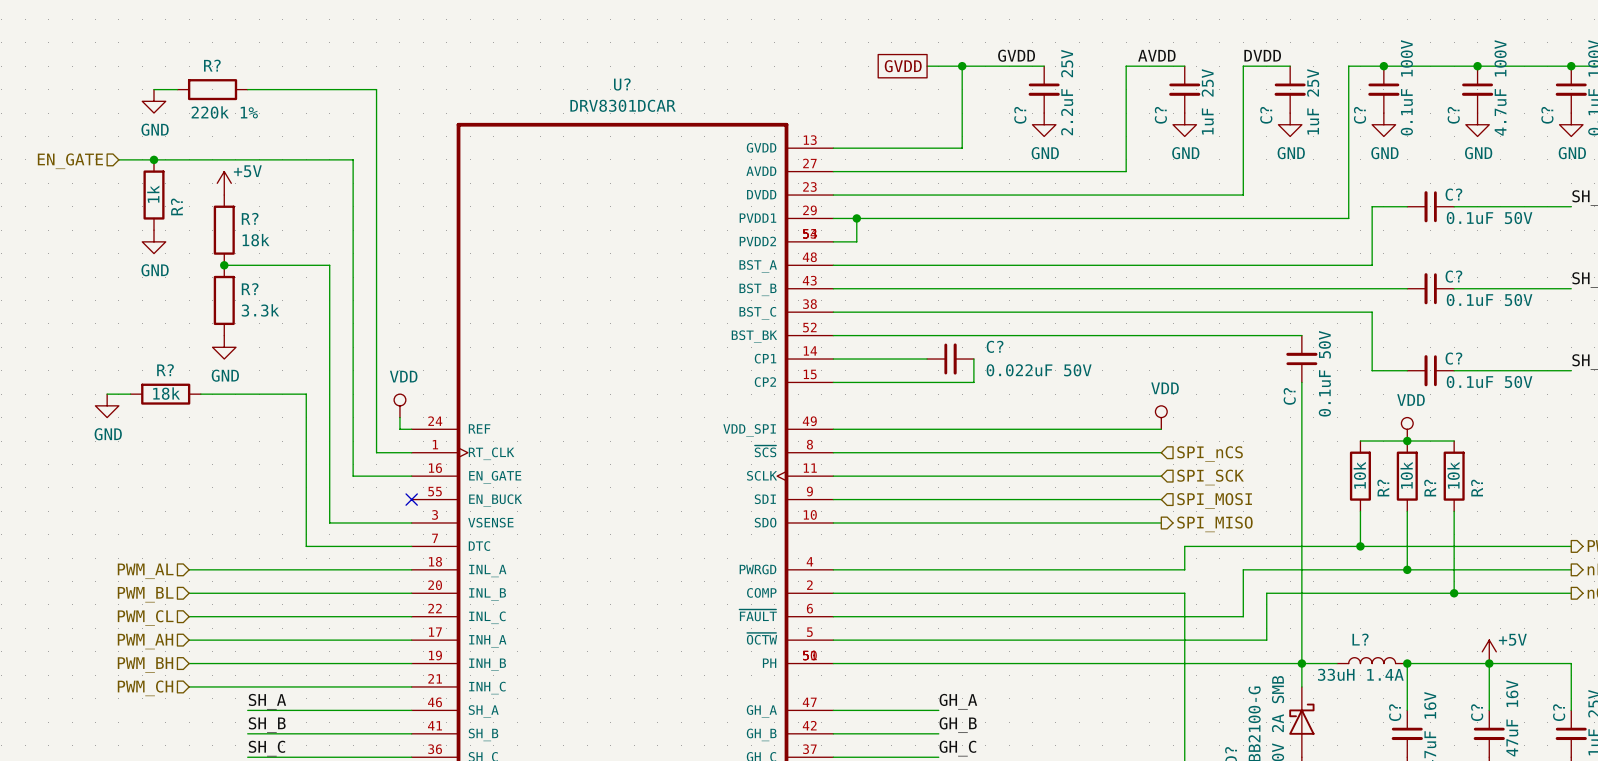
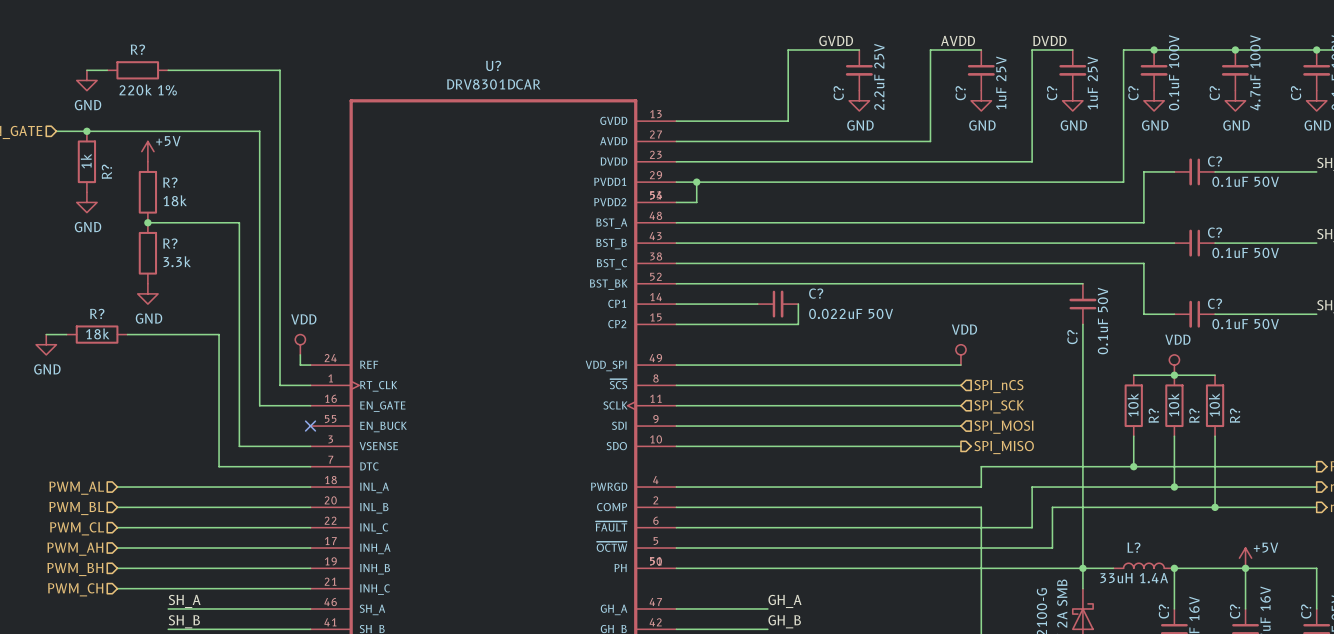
global label: GVDD (903, 66) -> none
wire: (927, 66) (962, 66) -> none
junction: (962, 66) -> none

